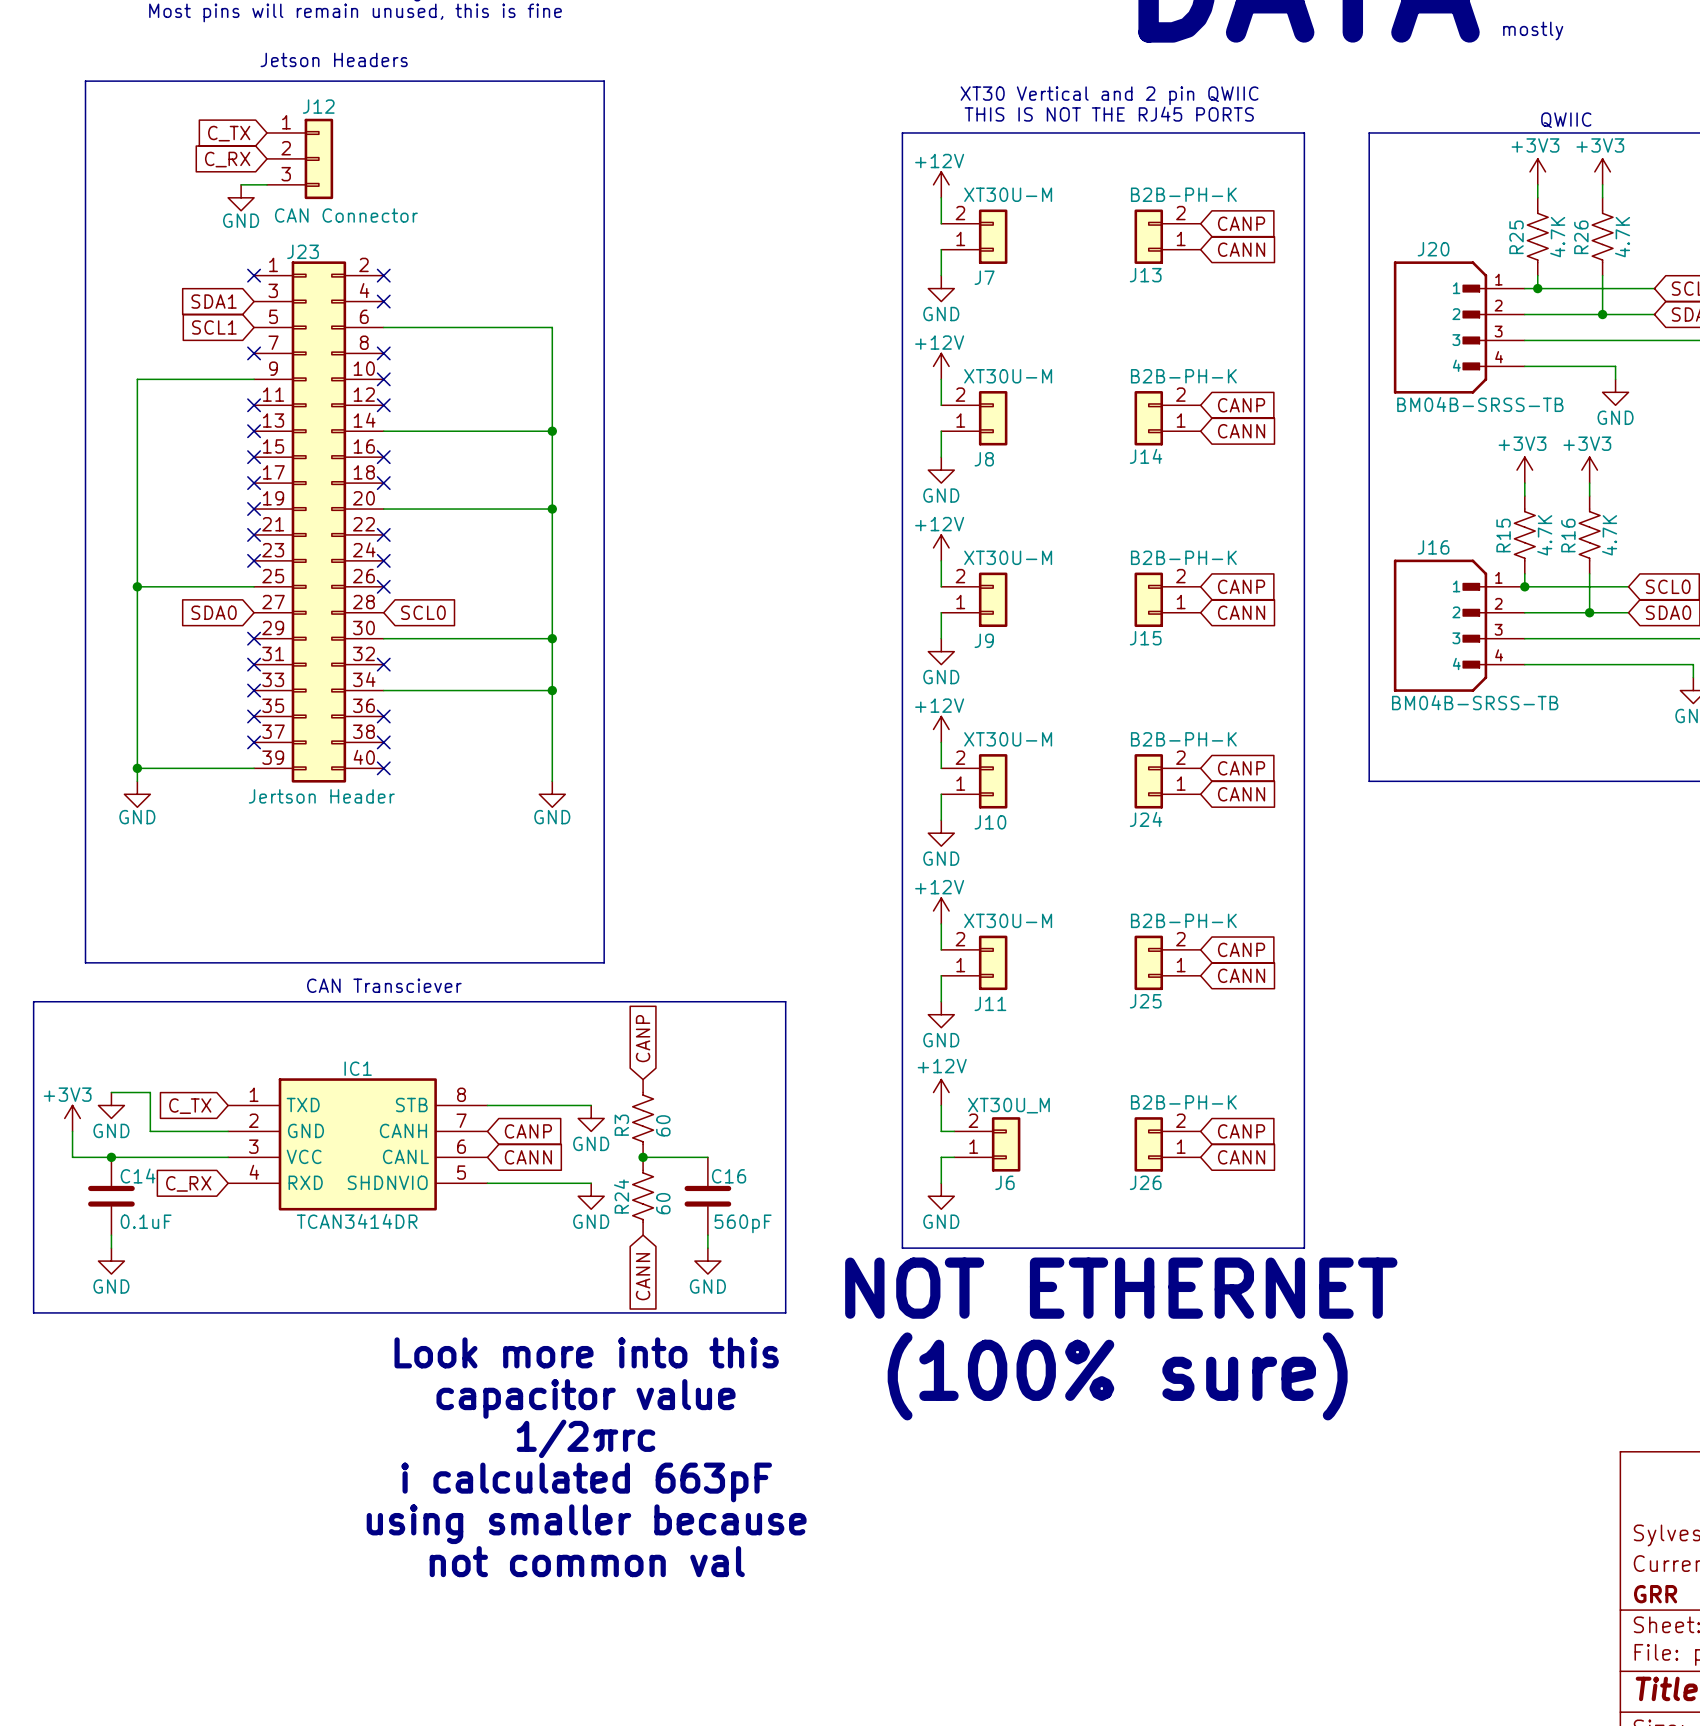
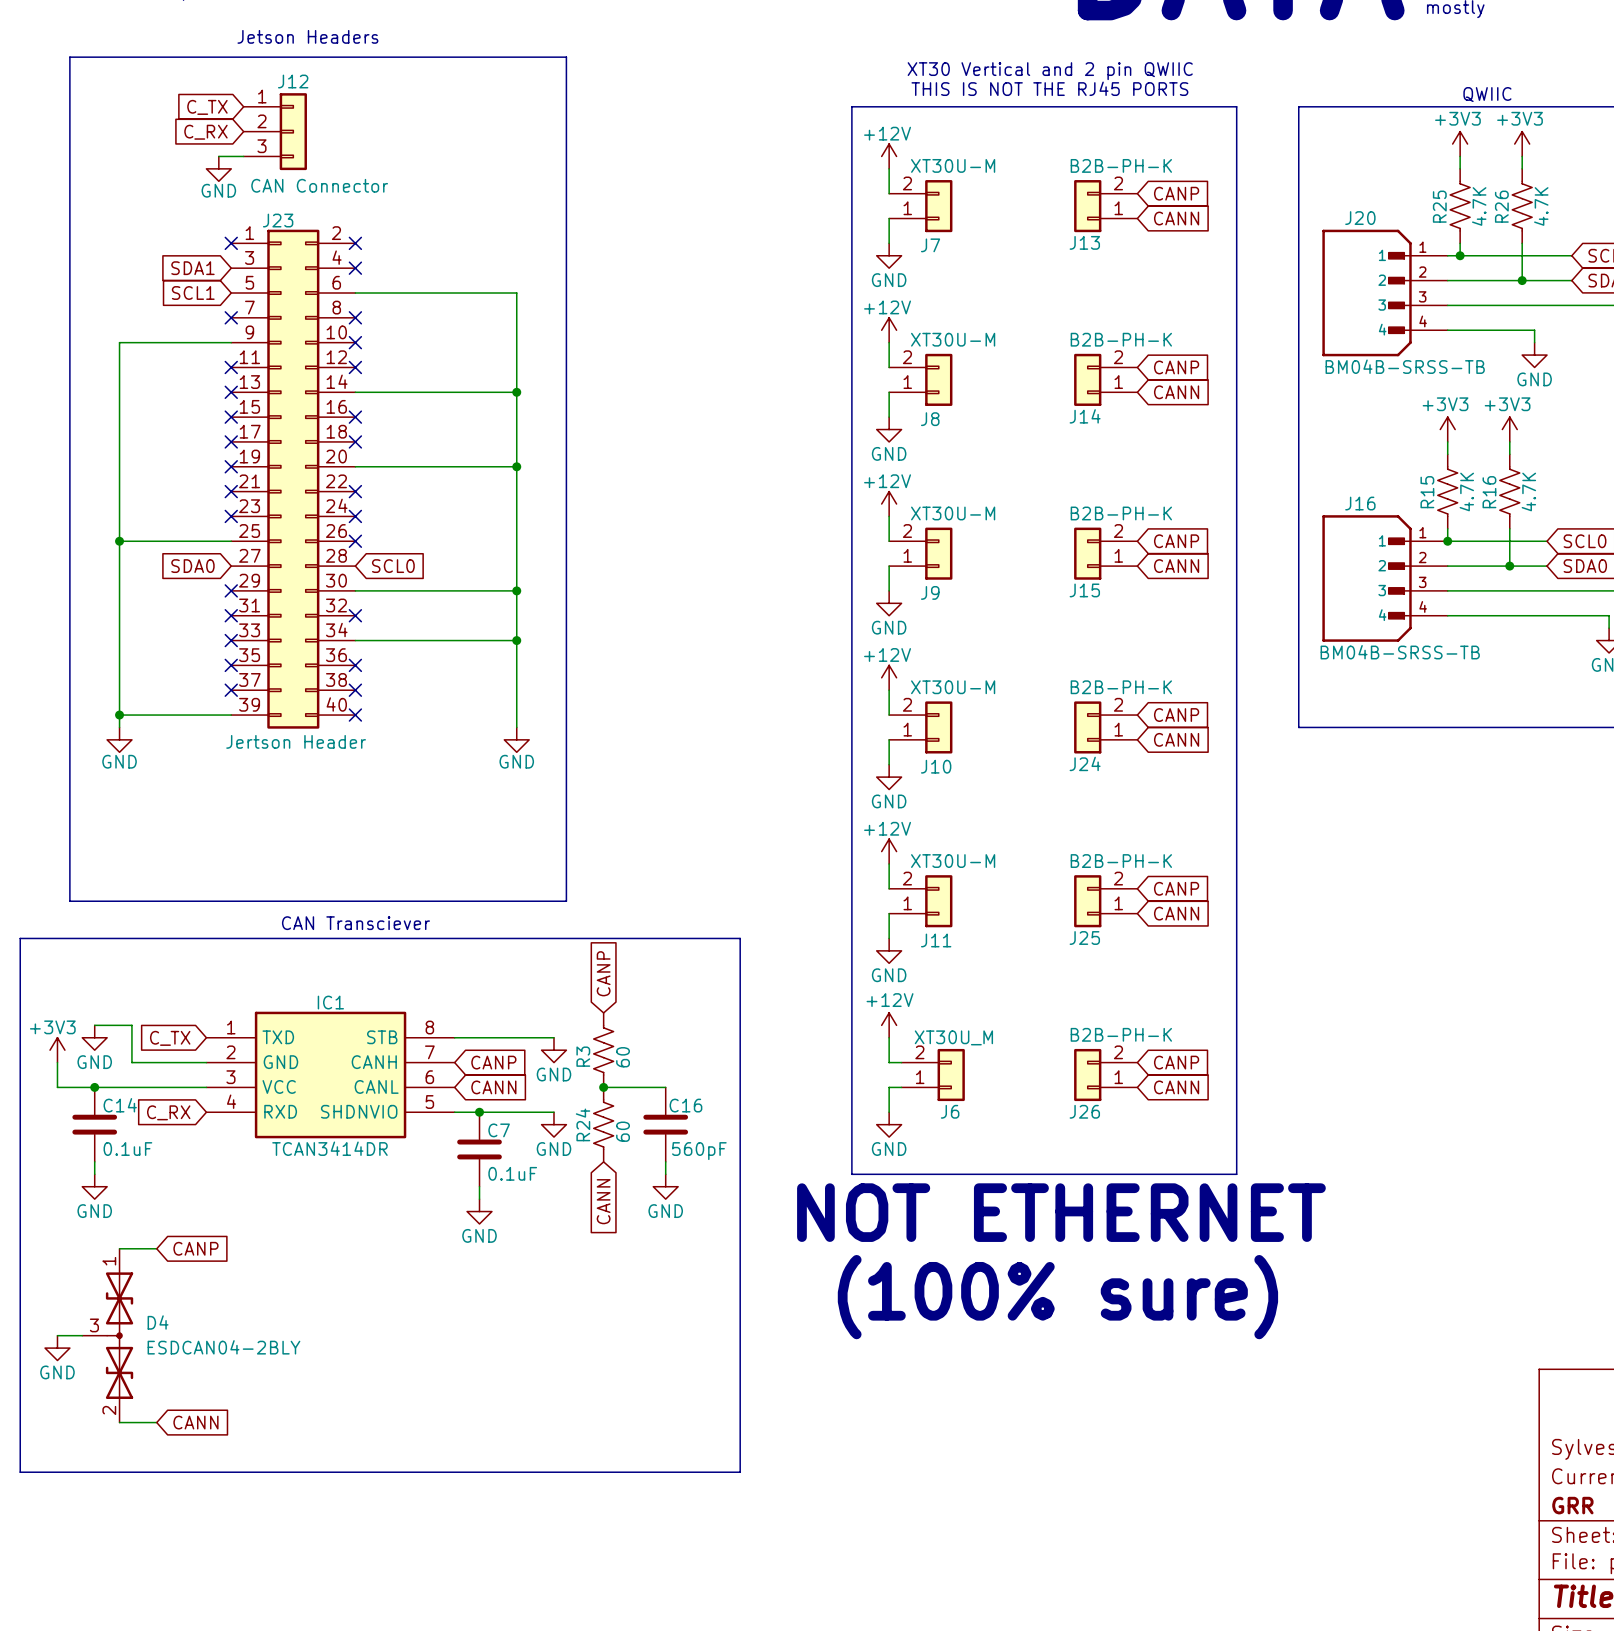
junction: none -> (479, 1112)
C7: none -> 0.1uF (479, 1149)
wire: none -> (479, 1186) (479, 1199)
power symbol: none -> GND (479, 1211)
line: (33, 1312) (785, 1312) -> (20, 1236) (20, 1472) (740, 1472) (740, 1236)
wire: none -> (119, 1248) (156, 1248)
global label: none -> CANP (195, 1248)
text: Look more into this (586, 1352) -> none
text: capacitor value (586, 1398) -> none
wire: none -> (57, 1335) (82, 1335)
D4: none -> ESDCAN04-2BLY (107, 1335)
power symbol: none -> GND (57, 1348)
text: 1/2πrc (586, 1438) -> none
text: i calculated 663pF (586, 1482) -> none
wire: none -> (119, 1422) (156, 1422)
global label: none -> CANN (195, 1422)
text: using smaller because (586, 1524) -> none
text: not common val (587, 1561) -> none

